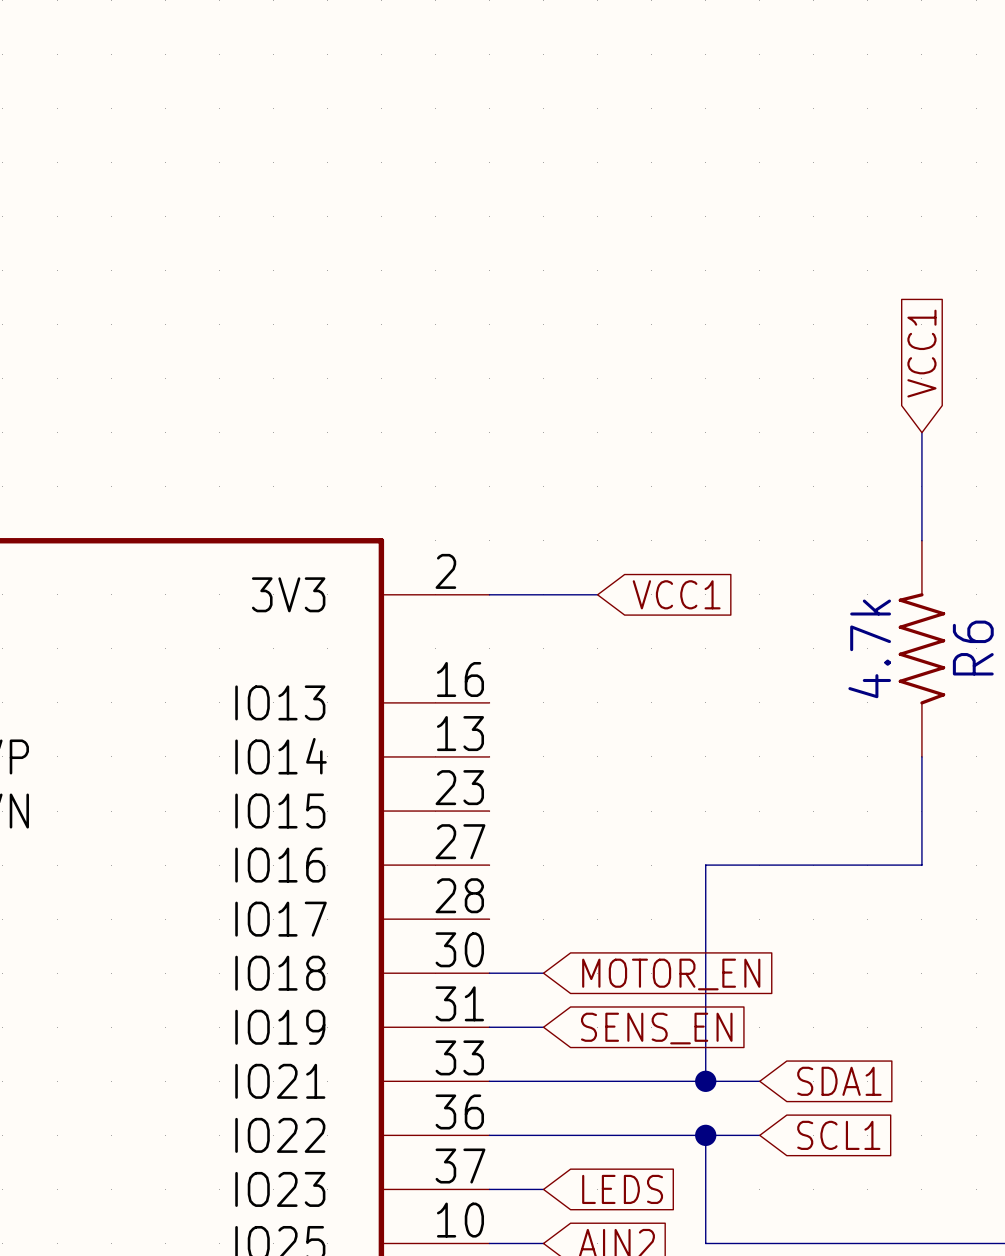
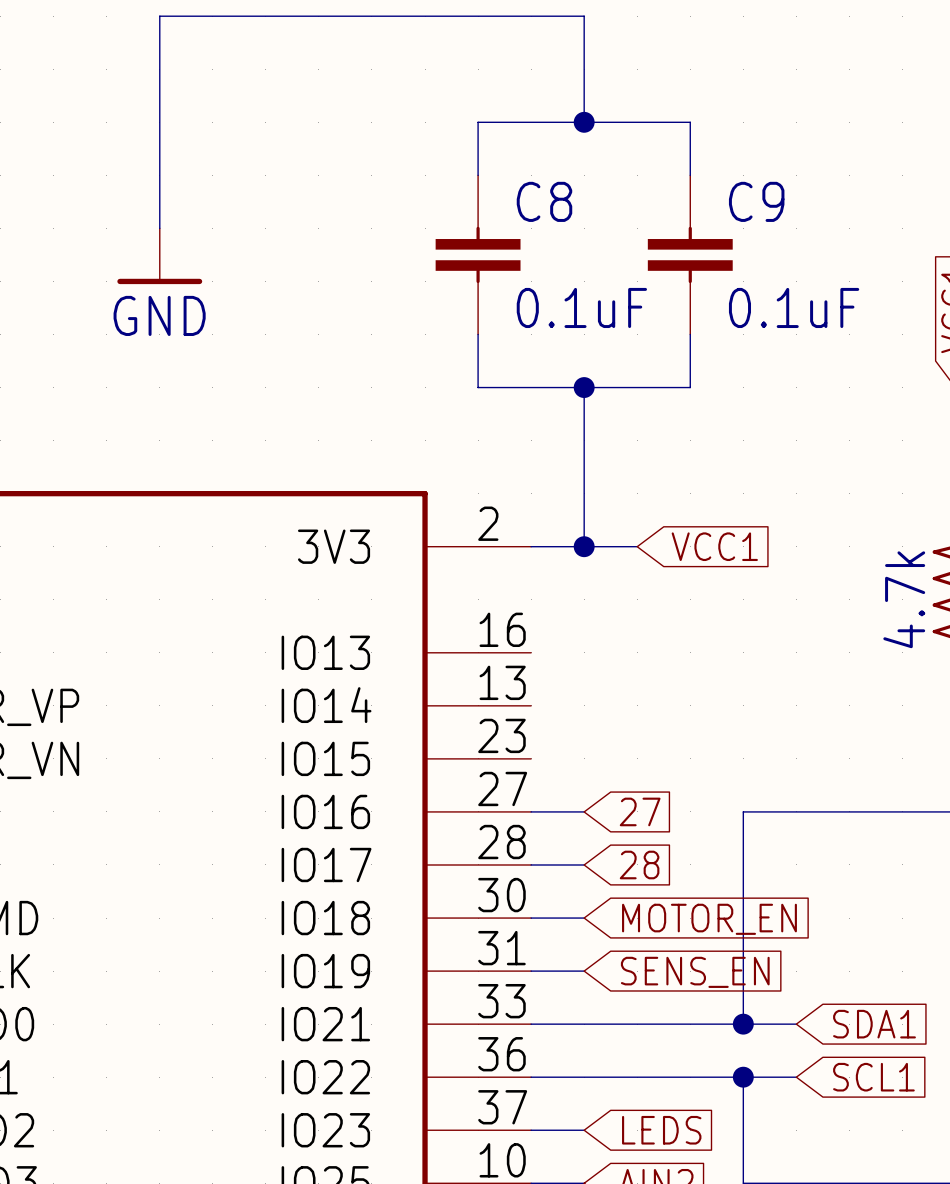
wire: none -> (584, 122) (584, 16) (159, 16) (159, 228)
junction: none -> (584, 122)
wire: none -> (478, 175) (478, 122) (690, 122) (690, 175)
C8: none -> 0.1uF (478, 254)
C9: none -> 0.1uF (690, 254)
power symbol: none -> GND (159, 256)
wire: none -> (478, 334) (478, 387) (690, 387) (690, 334)
wire: none -> (584, 387) (584, 546)
junction: none -> (584, 387)
junction: none -> (584, 546)
wire: none -> (531, 811) (584, 811)
global label: none -> 27 (640, 811)
wire: none -> (531, 864) (584, 864)
global label: none -> 28 (639, 864)

